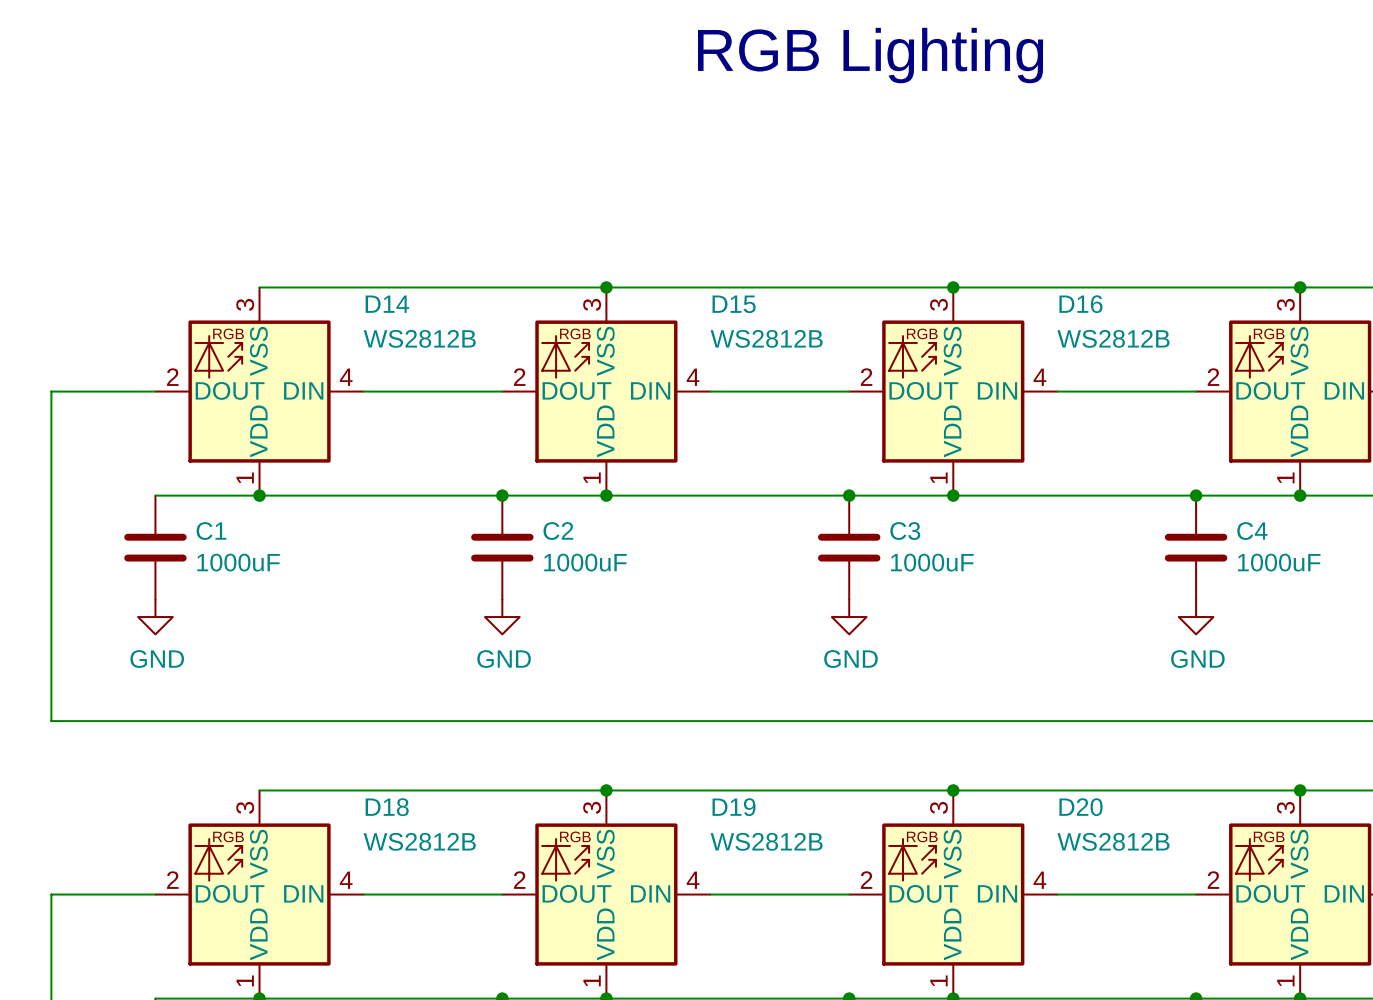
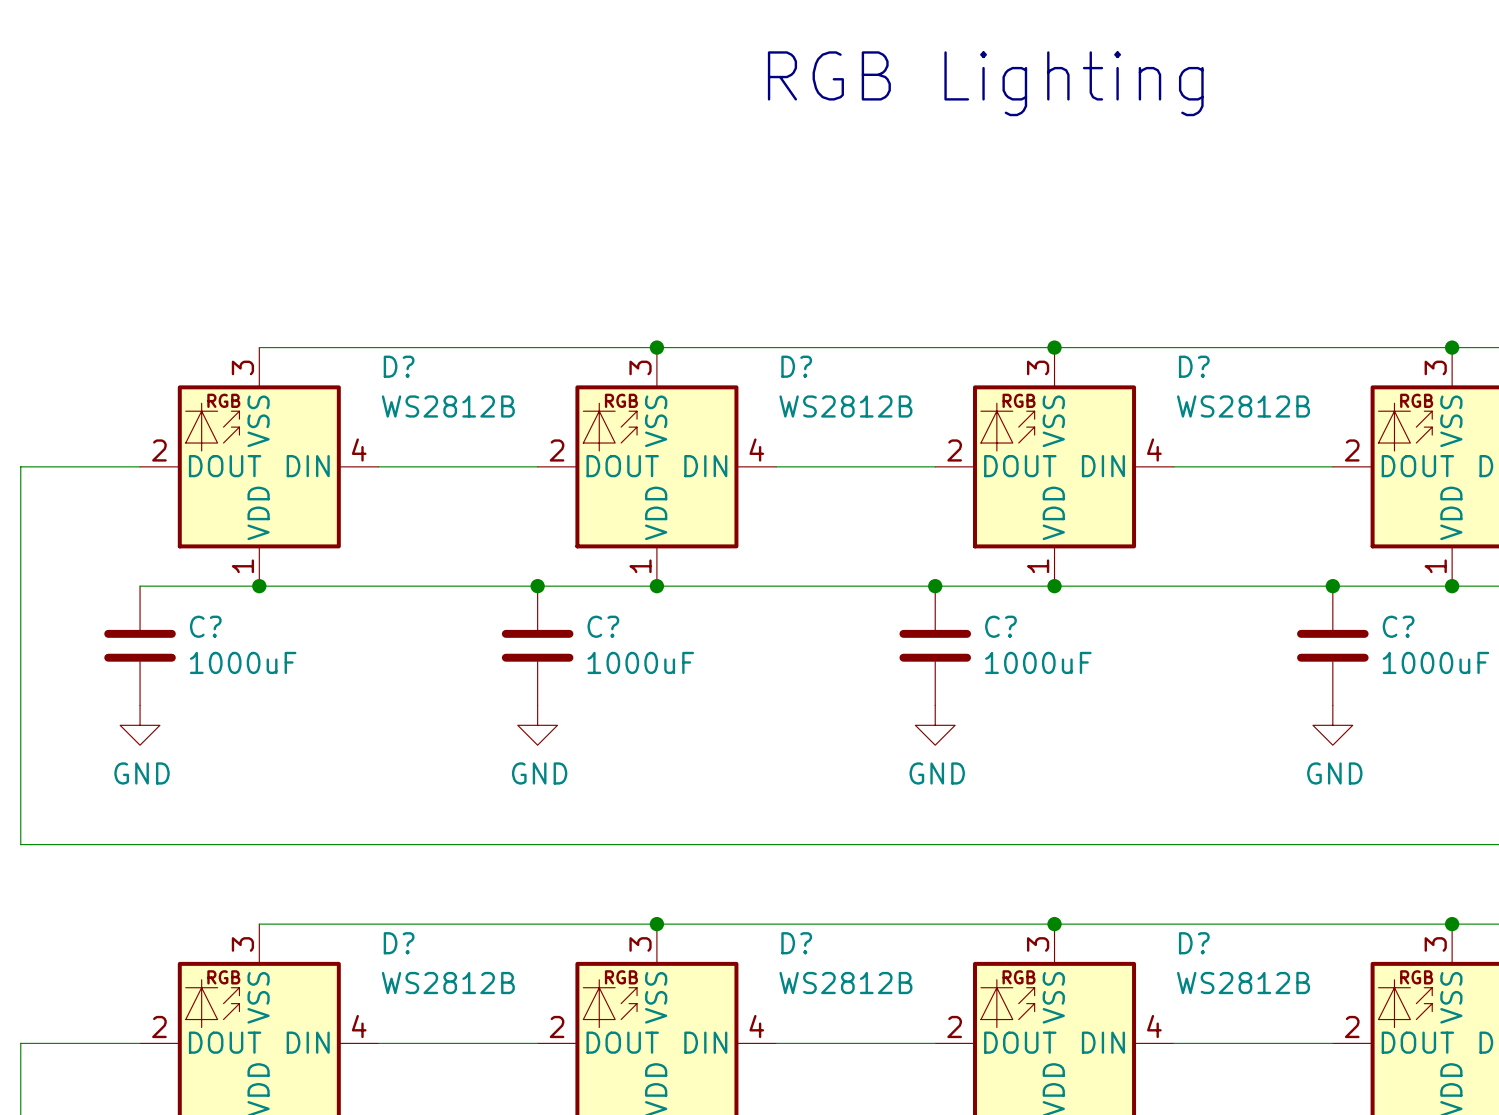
D14 name: D14 (387, 304) -> D? (399, 366)
D15 name: D15 (734, 304) -> D? (796, 366)
D16 name: D16 (1080, 304) -> D? (1194, 366)
C1 name: C1 (211, 531) -> C? (205, 626)
C2 name: C2 (558, 531) -> C? (603, 626)
C3 name: C3 (905, 531) -> C? (1000, 626)
C4 name: C4 (1252, 531) -> C? (1398, 626)
D18 name: D18 (387, 807) -> D? (399, 943)
D19 name: D19 (734, 807) -> D? (796, 943)
D20 name: D20 (1081, 807) -> D? (1194, 943)

